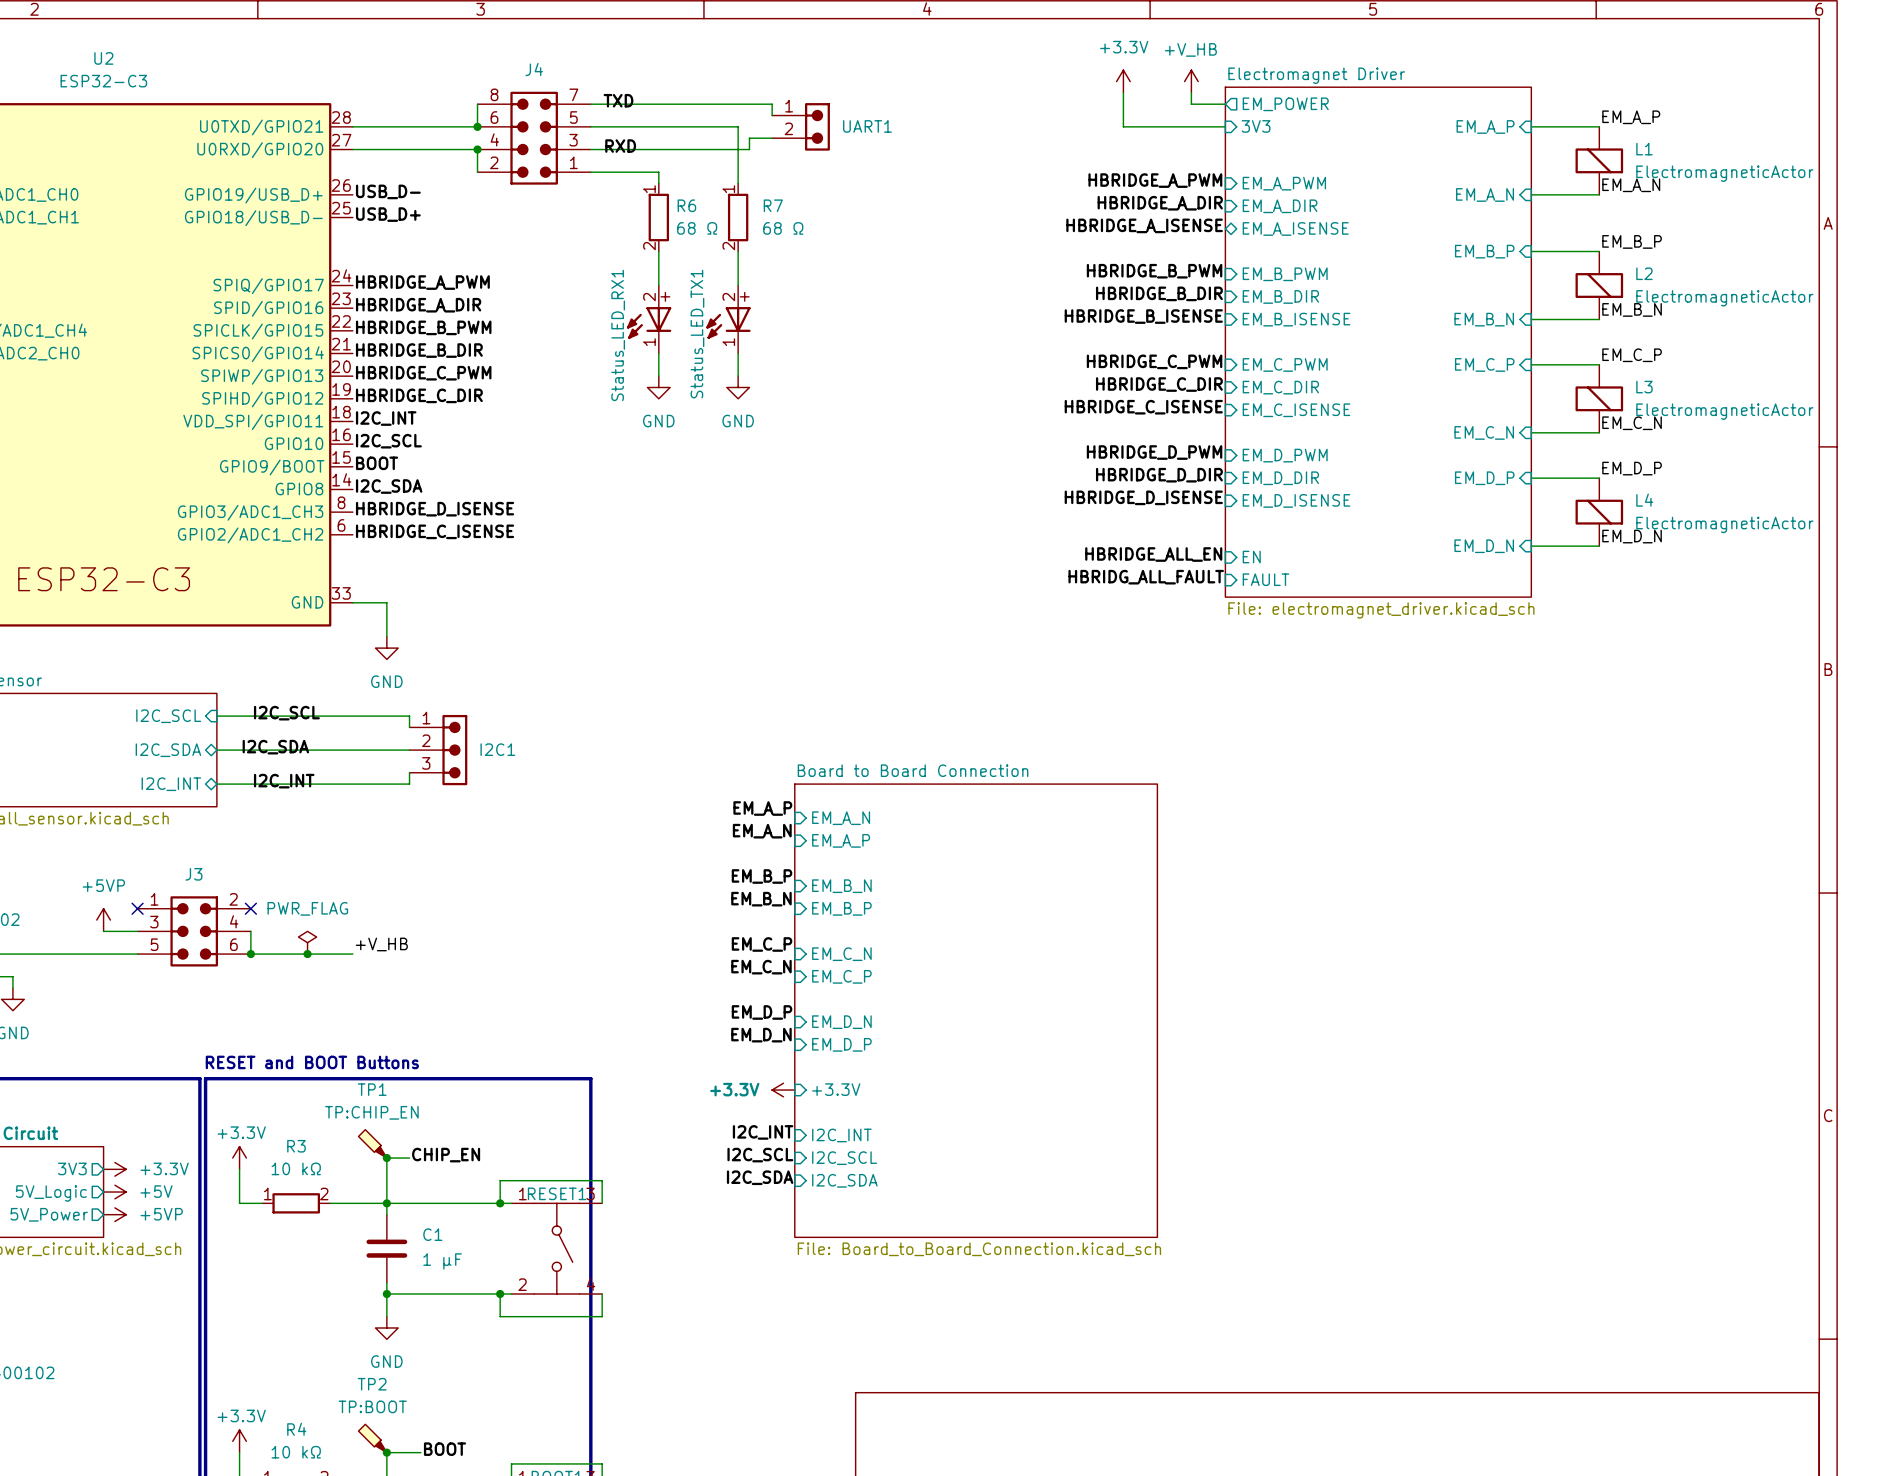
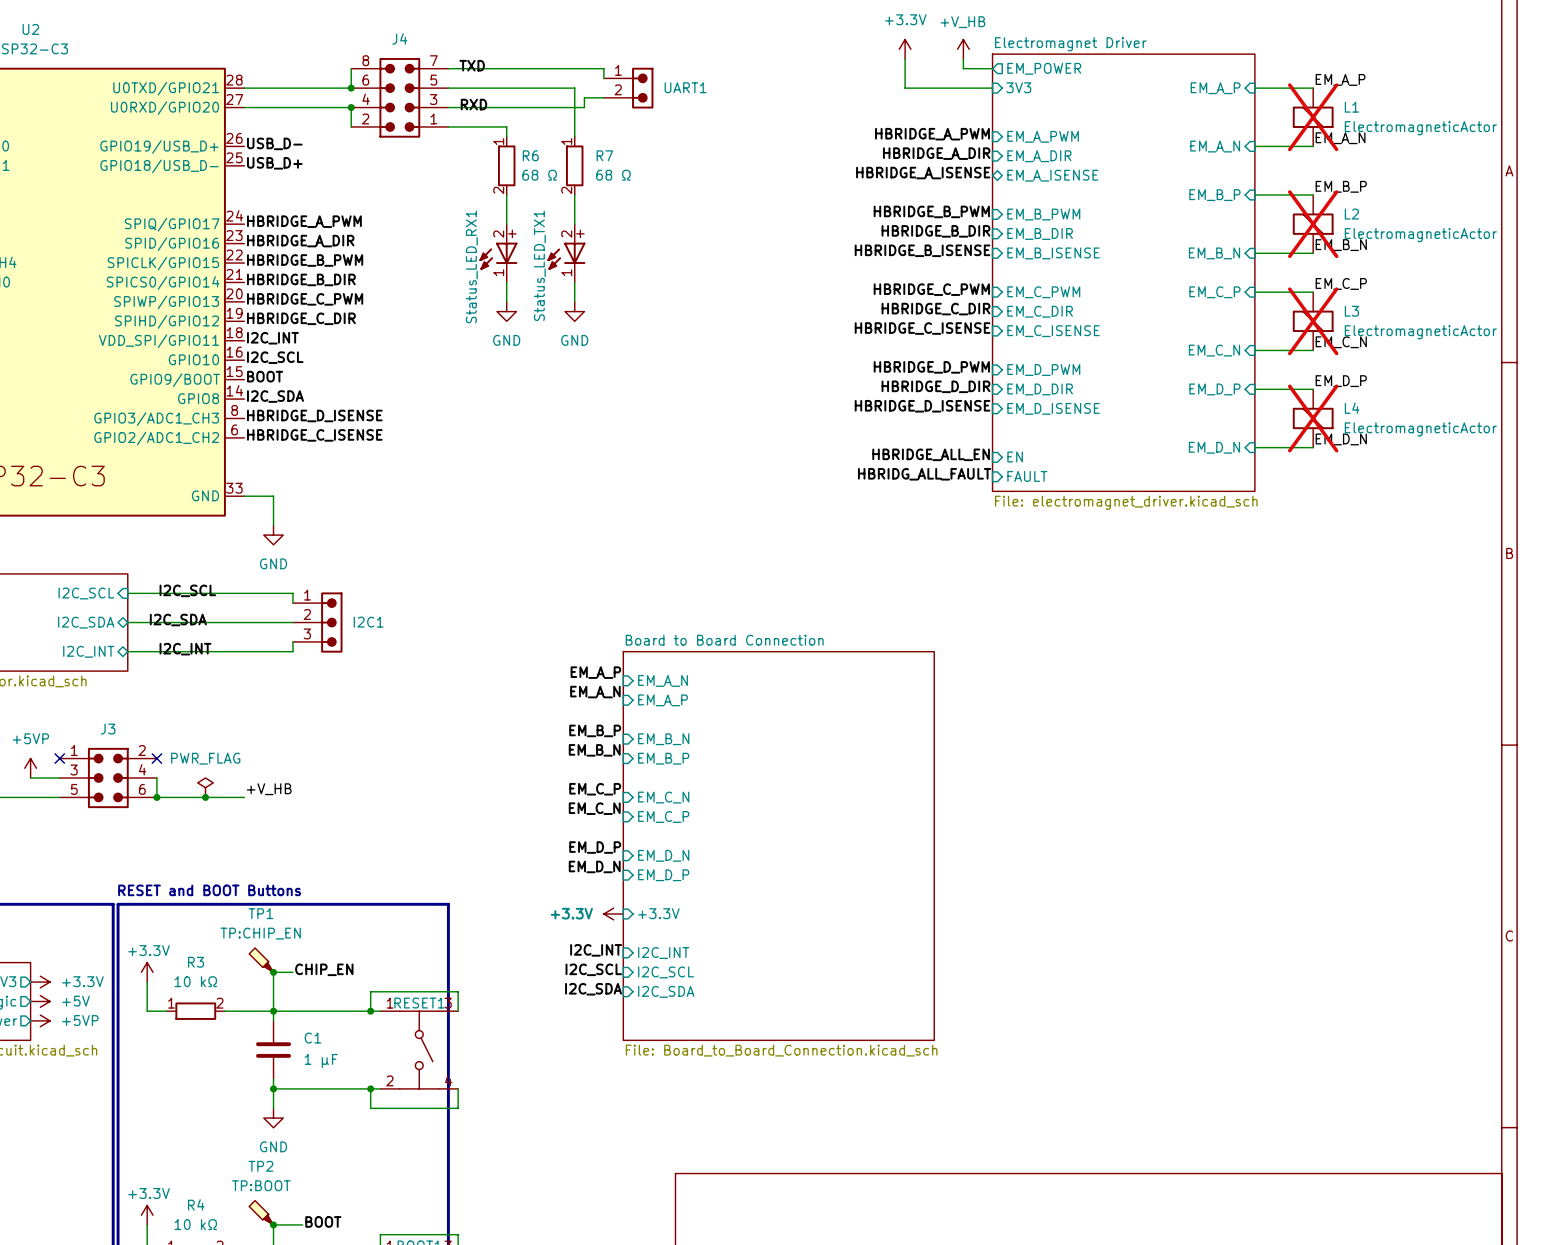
L1 do-not-place cross: none -> (1313, 117)
L2 do-not-place cross: none -> (1313, 224)
L3 do-not-place cross: none -> (1313, 321)
L4 do-not-place cross: none -> (1313, 418)

